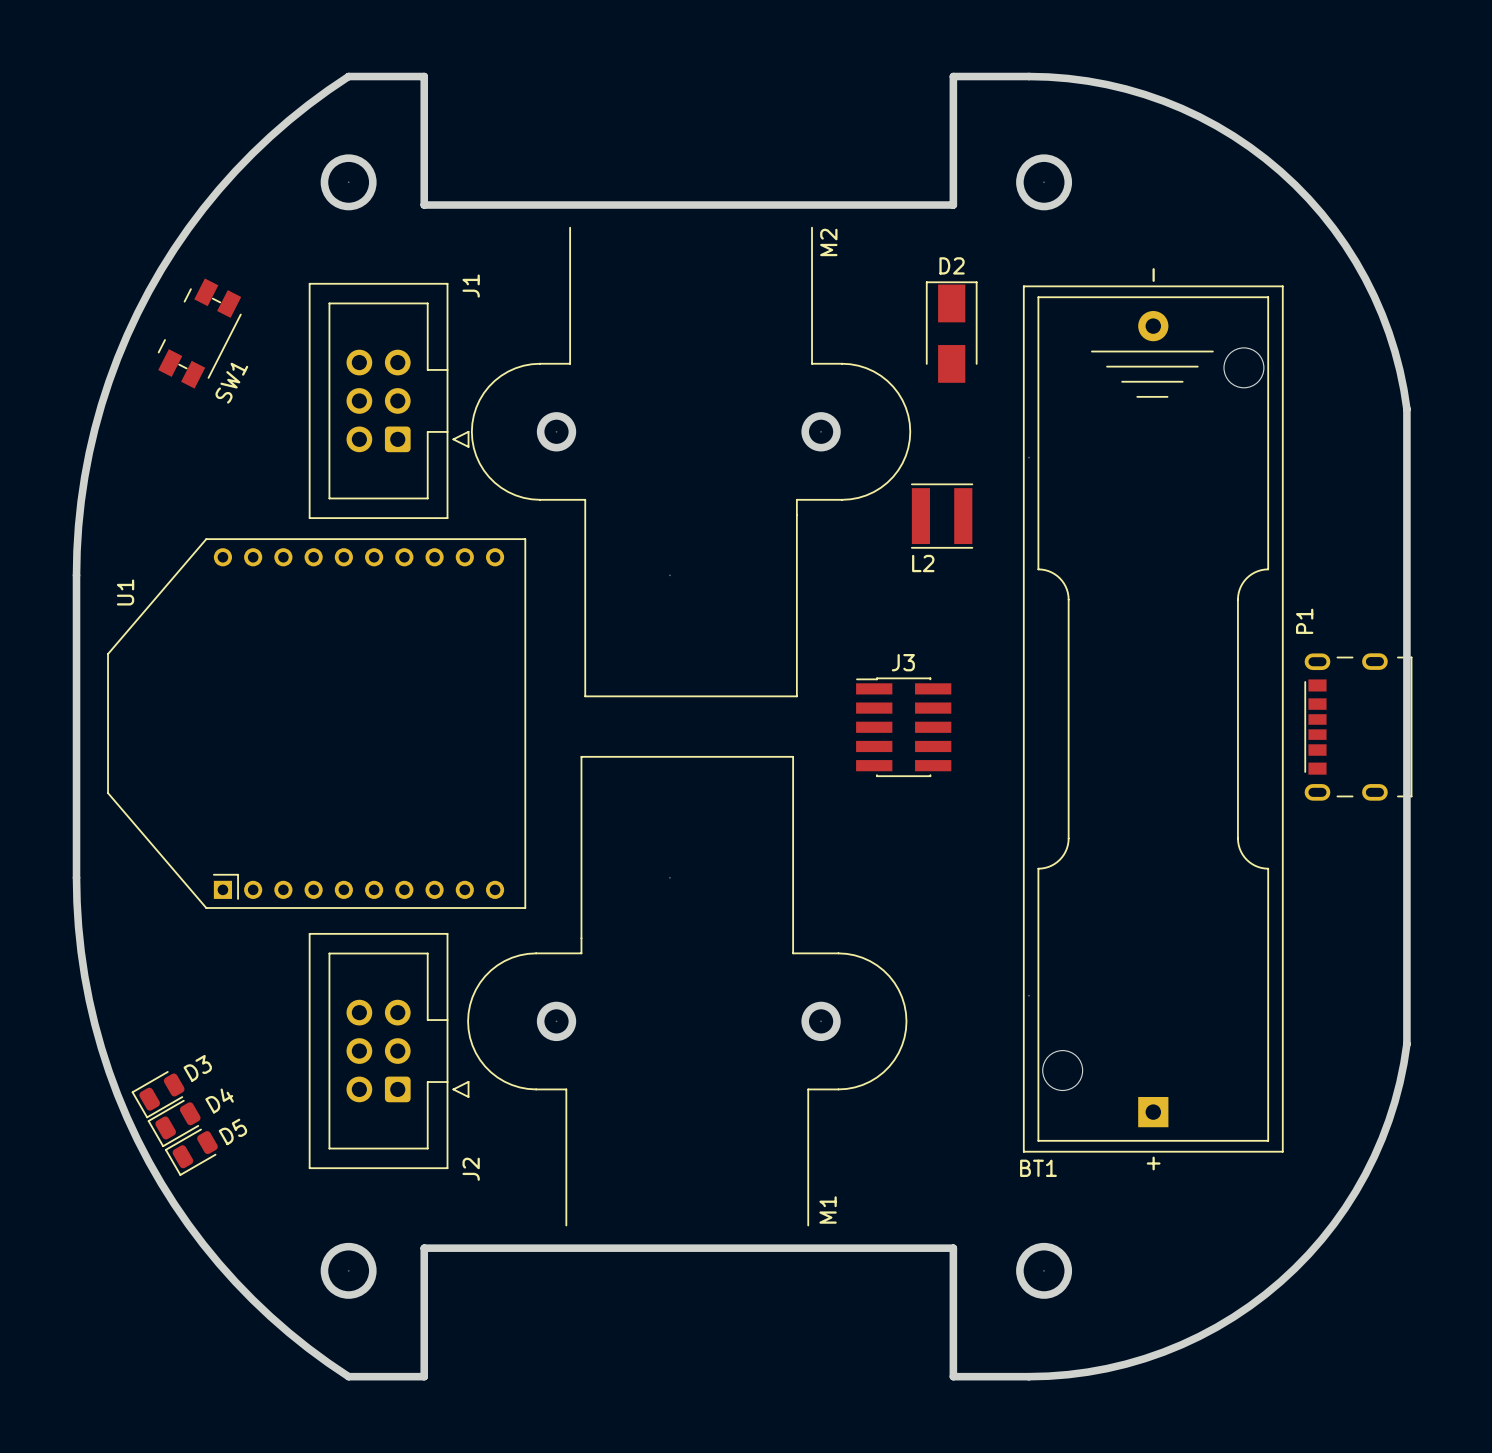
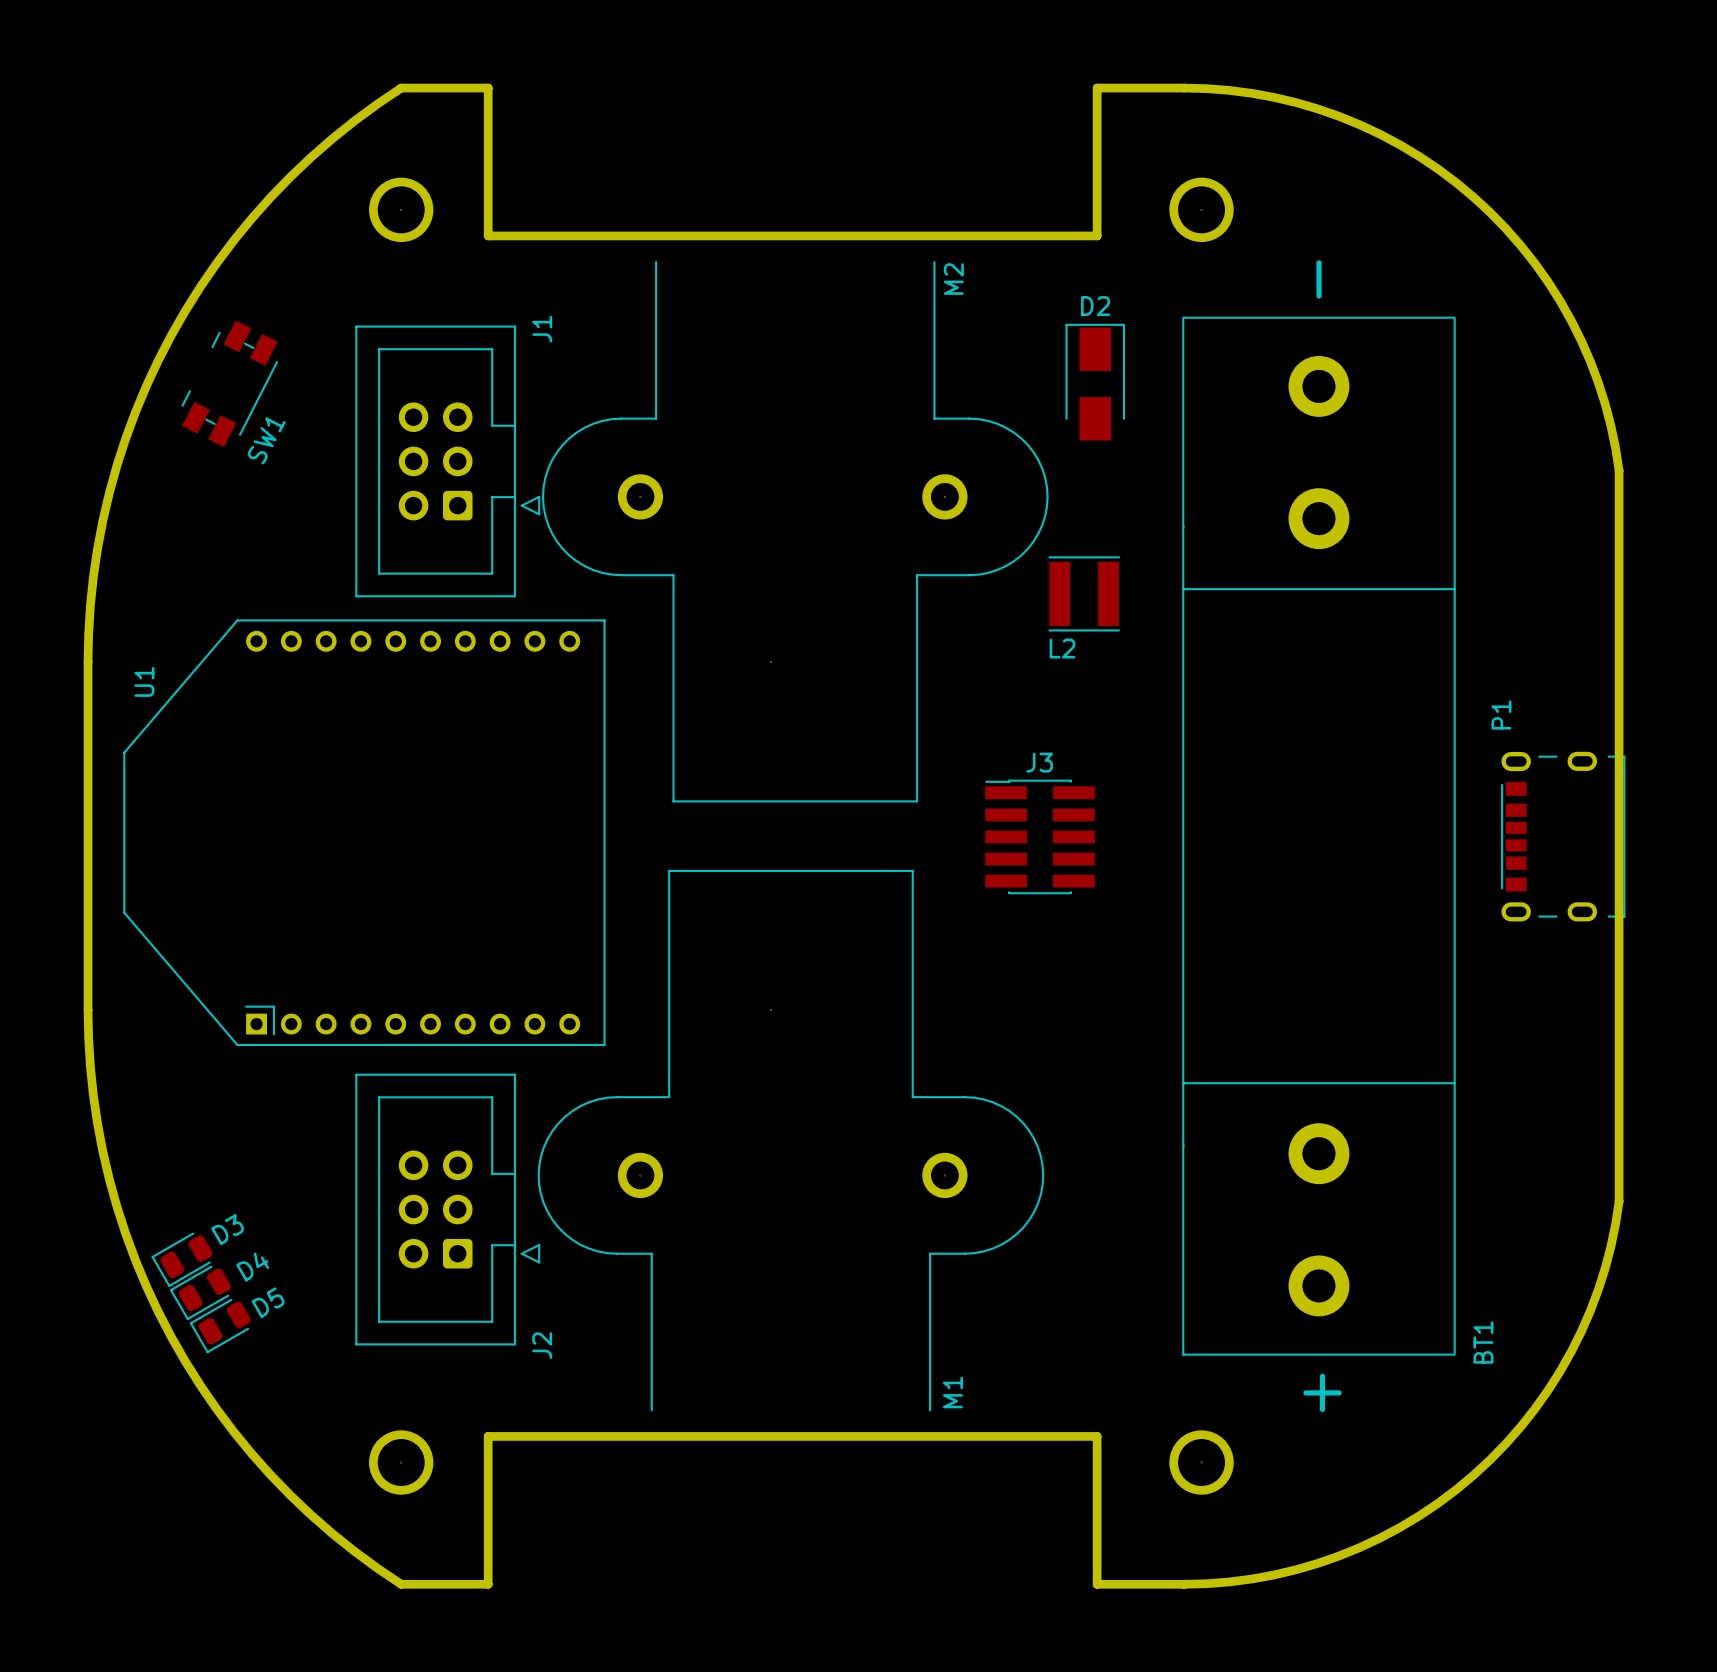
BT1 footprint: [1022, 285, 1284, 1153] -> [1182, 316, 1456, 1356]
BT1 name position: BT1 (1038, 1168) -> BT1 (1483, 1342)

